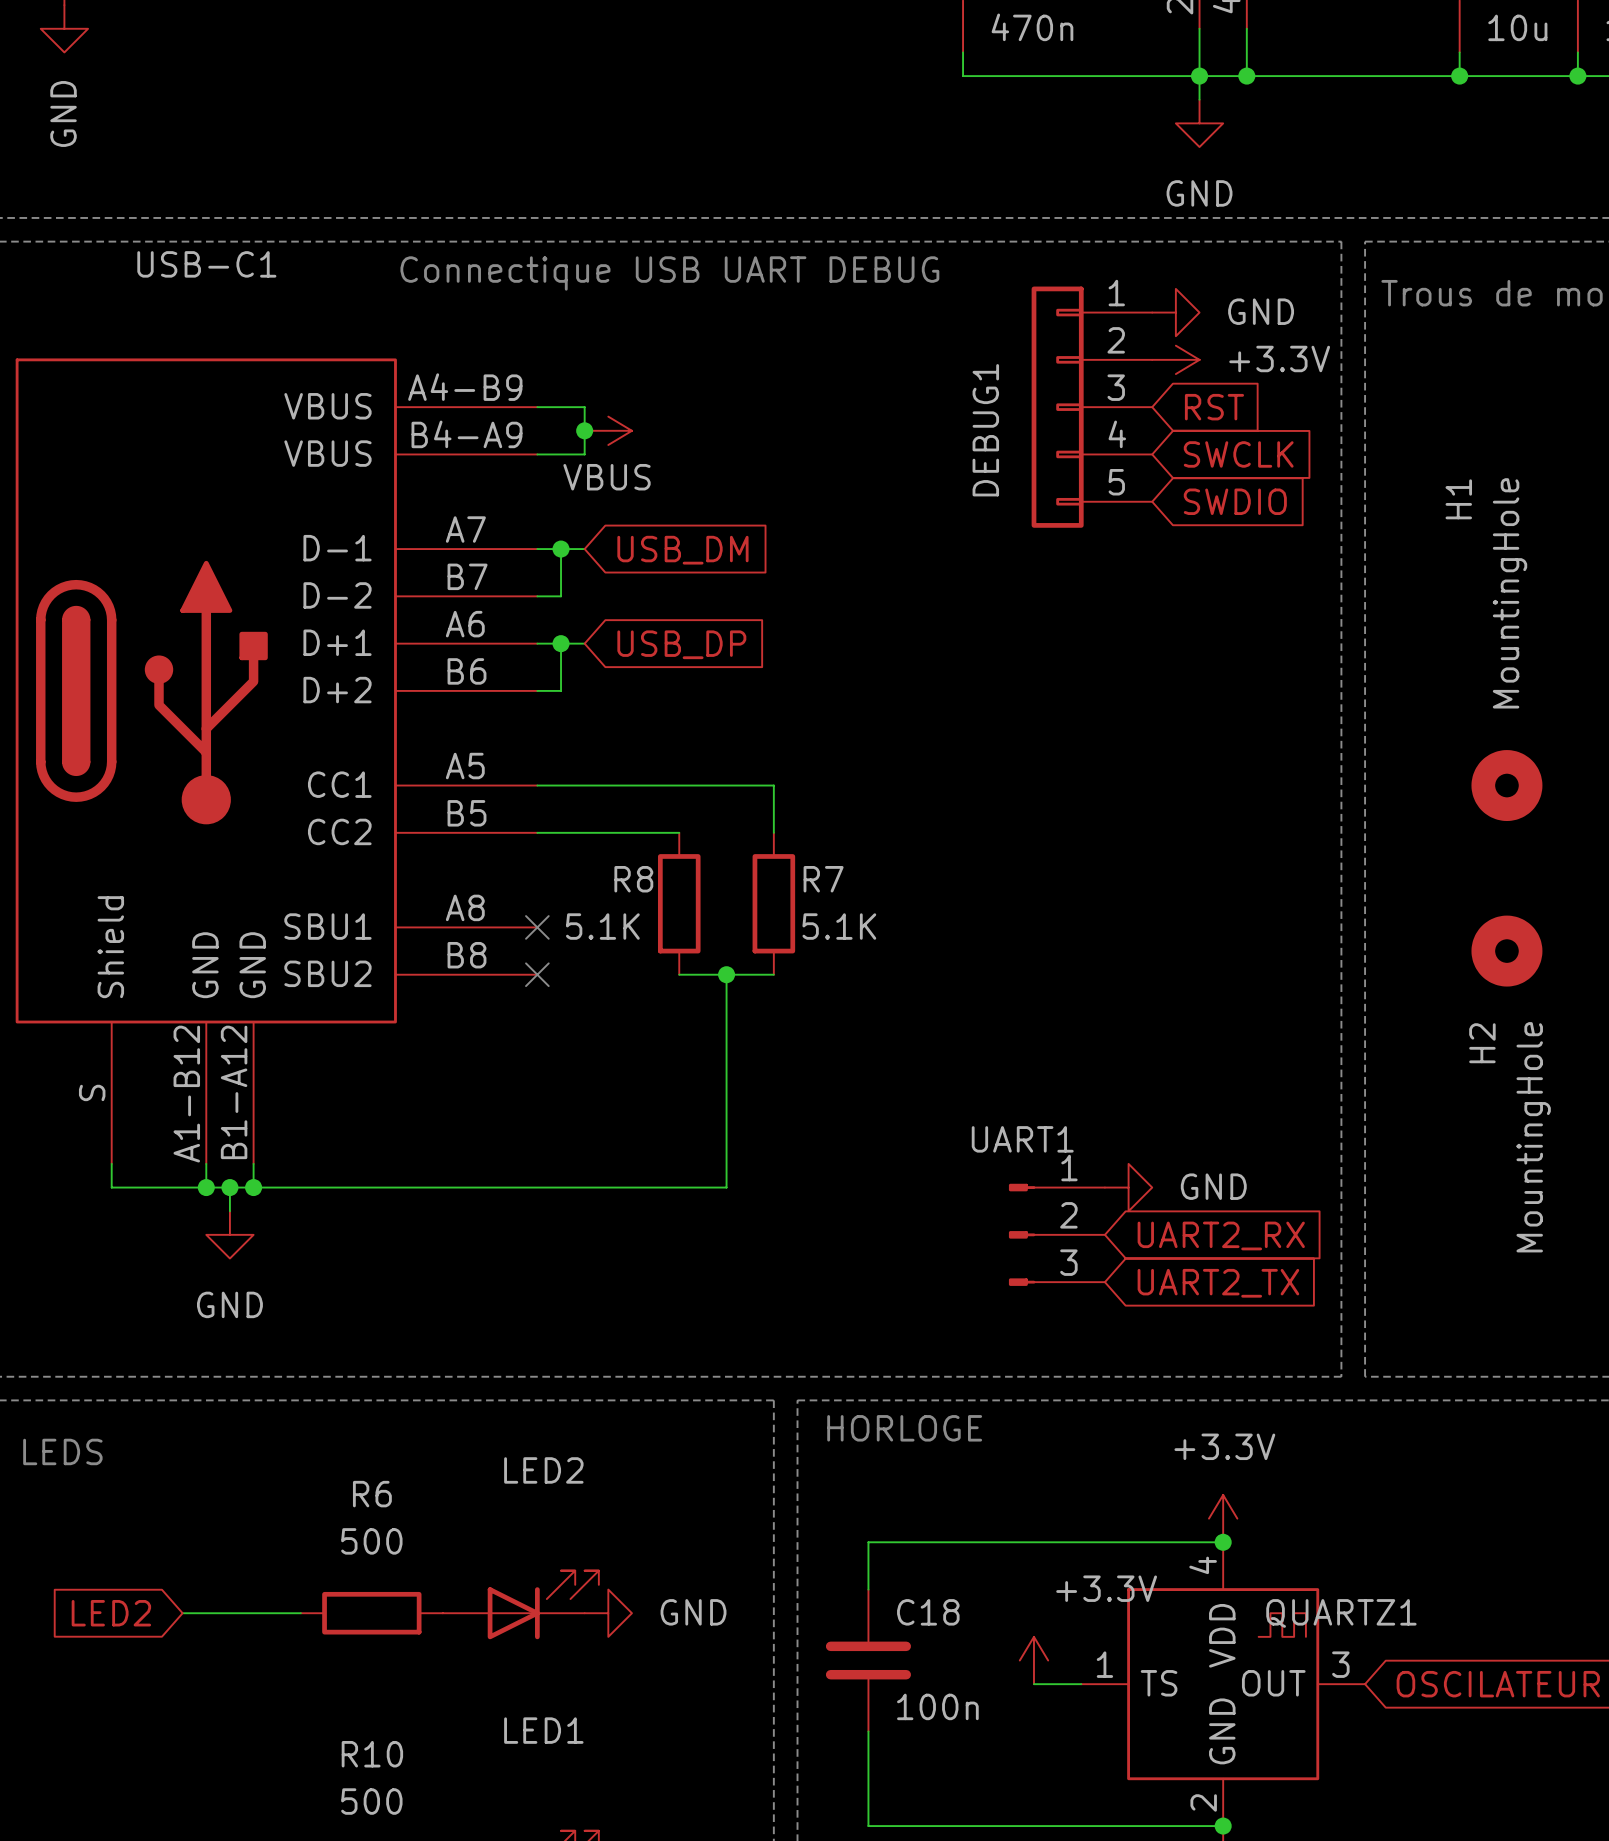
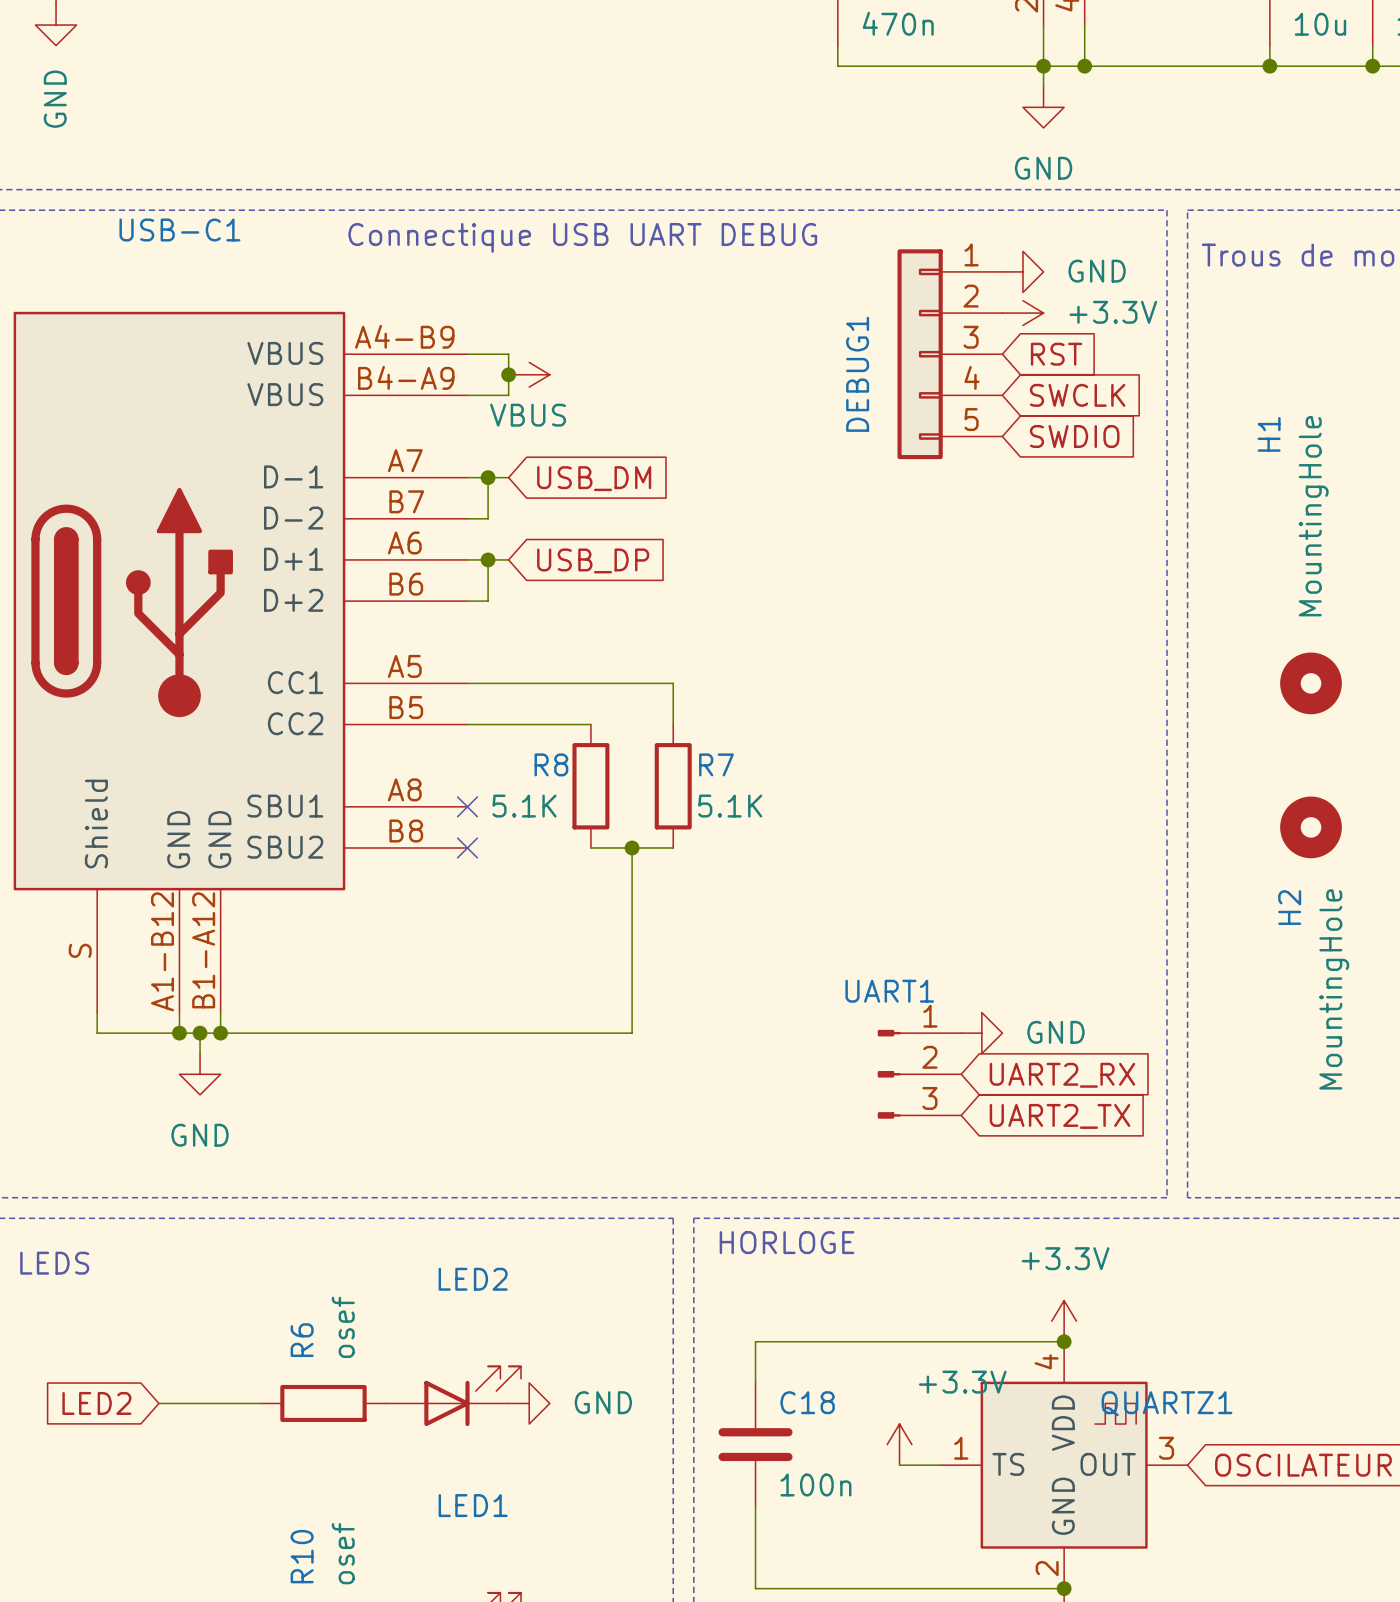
R6 name rotation: 0° (372, 1494) -> 90° counterclockwise (302, 1340)
R6 value: 500 (371, 1541) -> osef (343, 1327)
R10 name rotation: 0° (372, 1754) -> 90° counterclockwise (302, 1556)
R10 value: 500 (371, 1801) -> osef (343, 1553)

